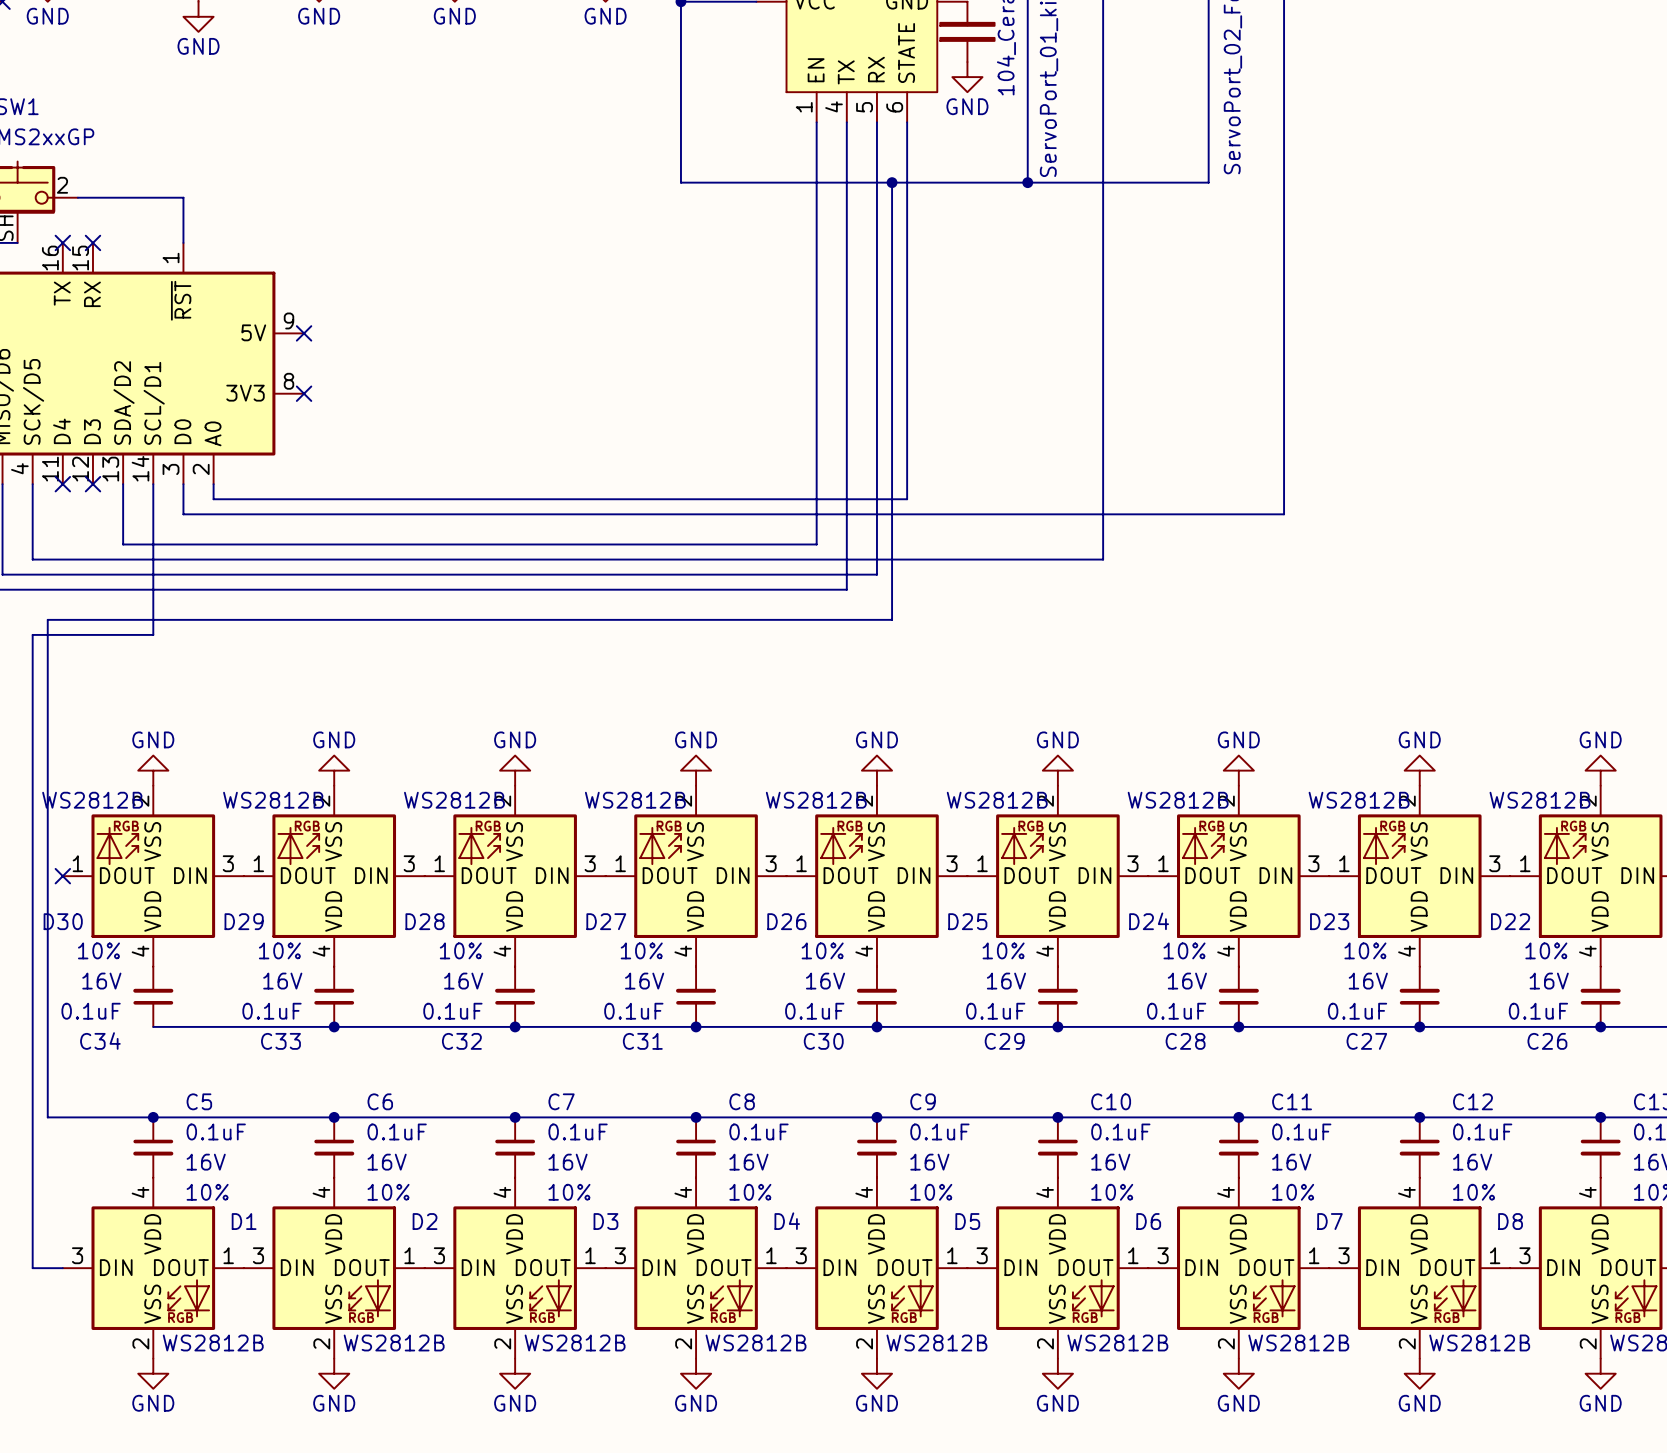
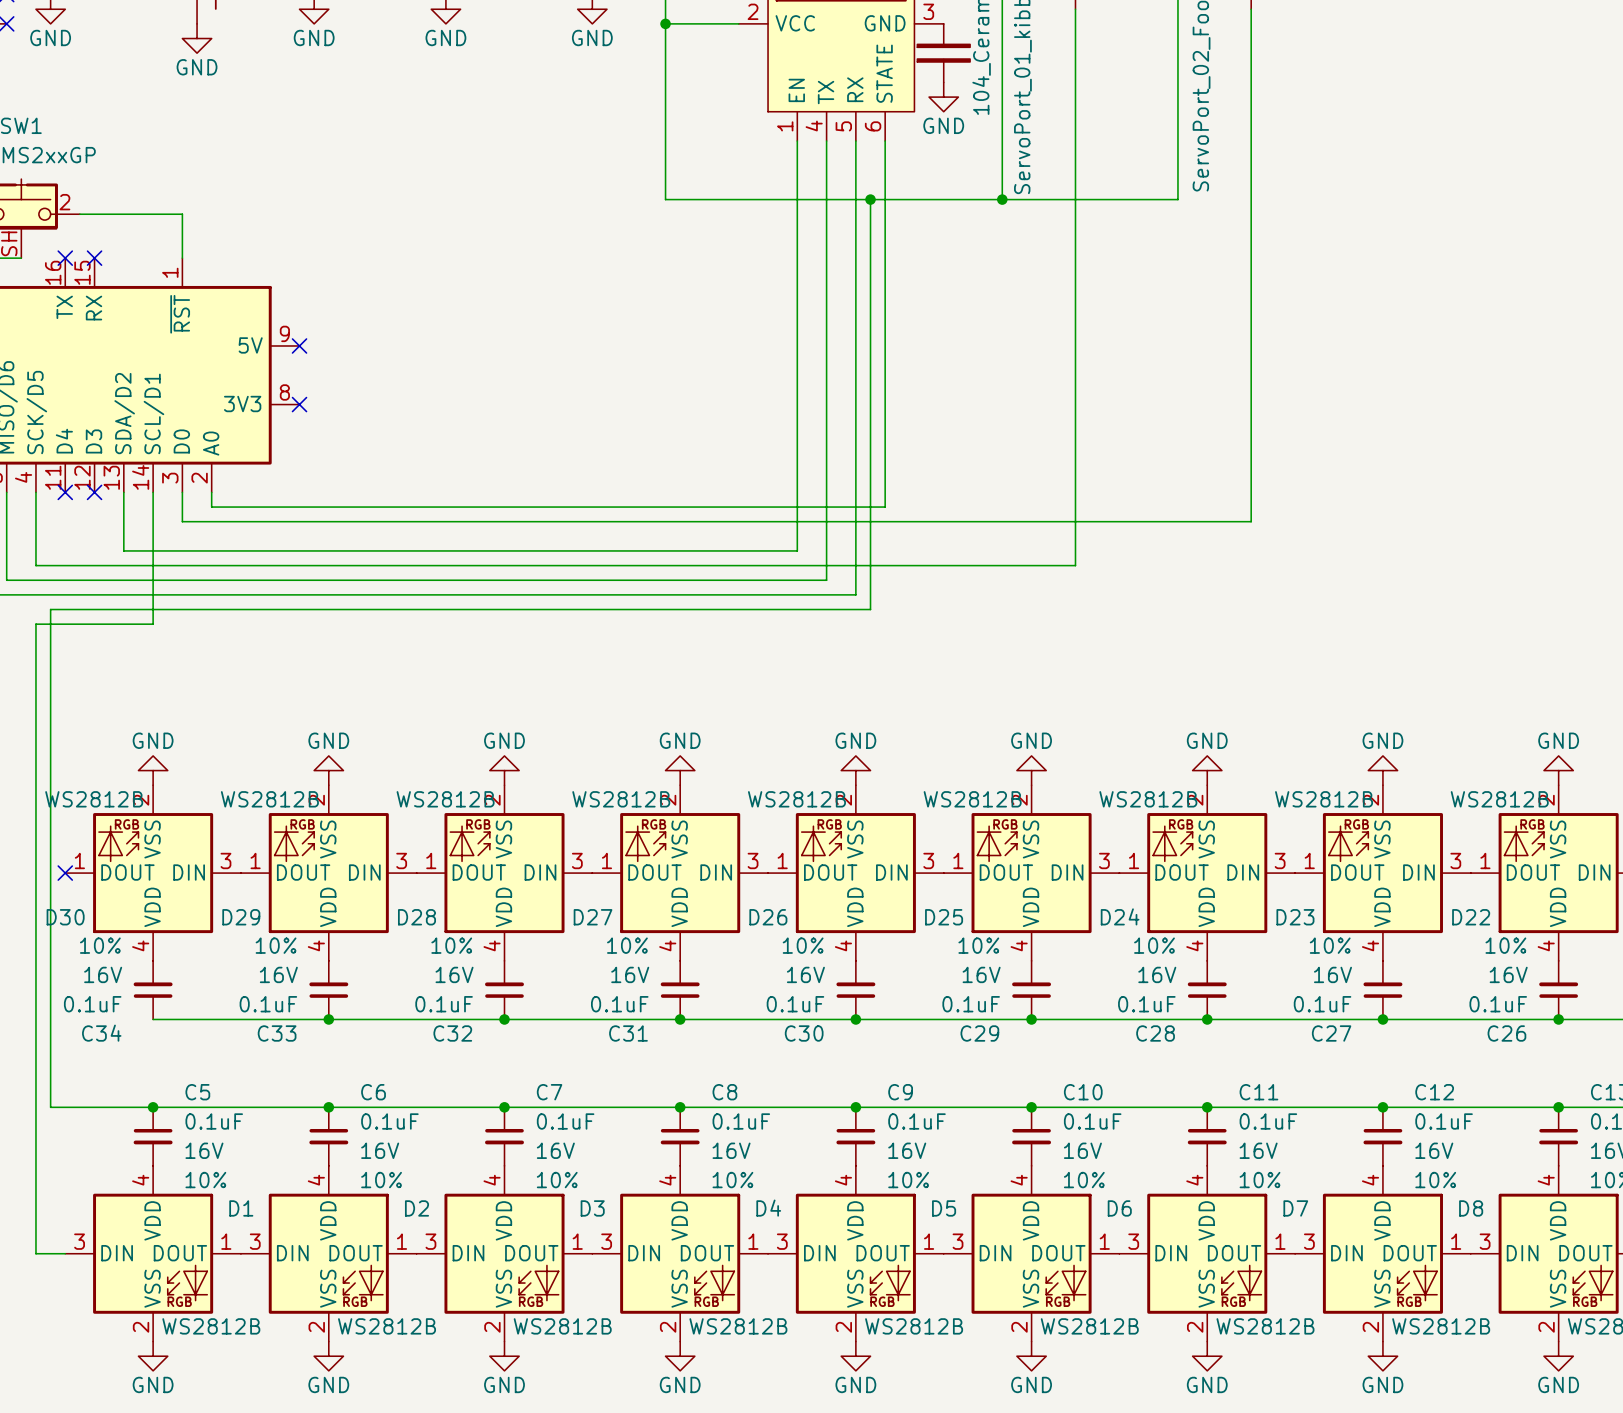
wire: (876, 574) (846, 574) (846, 589) -> (855, 580) (855, 594) (826, 594)
wire: (892, 604) (892, 619) (153, 619) (153, 634) (32, 634) -> (870, 609) (50, 609) (50, 624) (35, 624) (35, 638)

